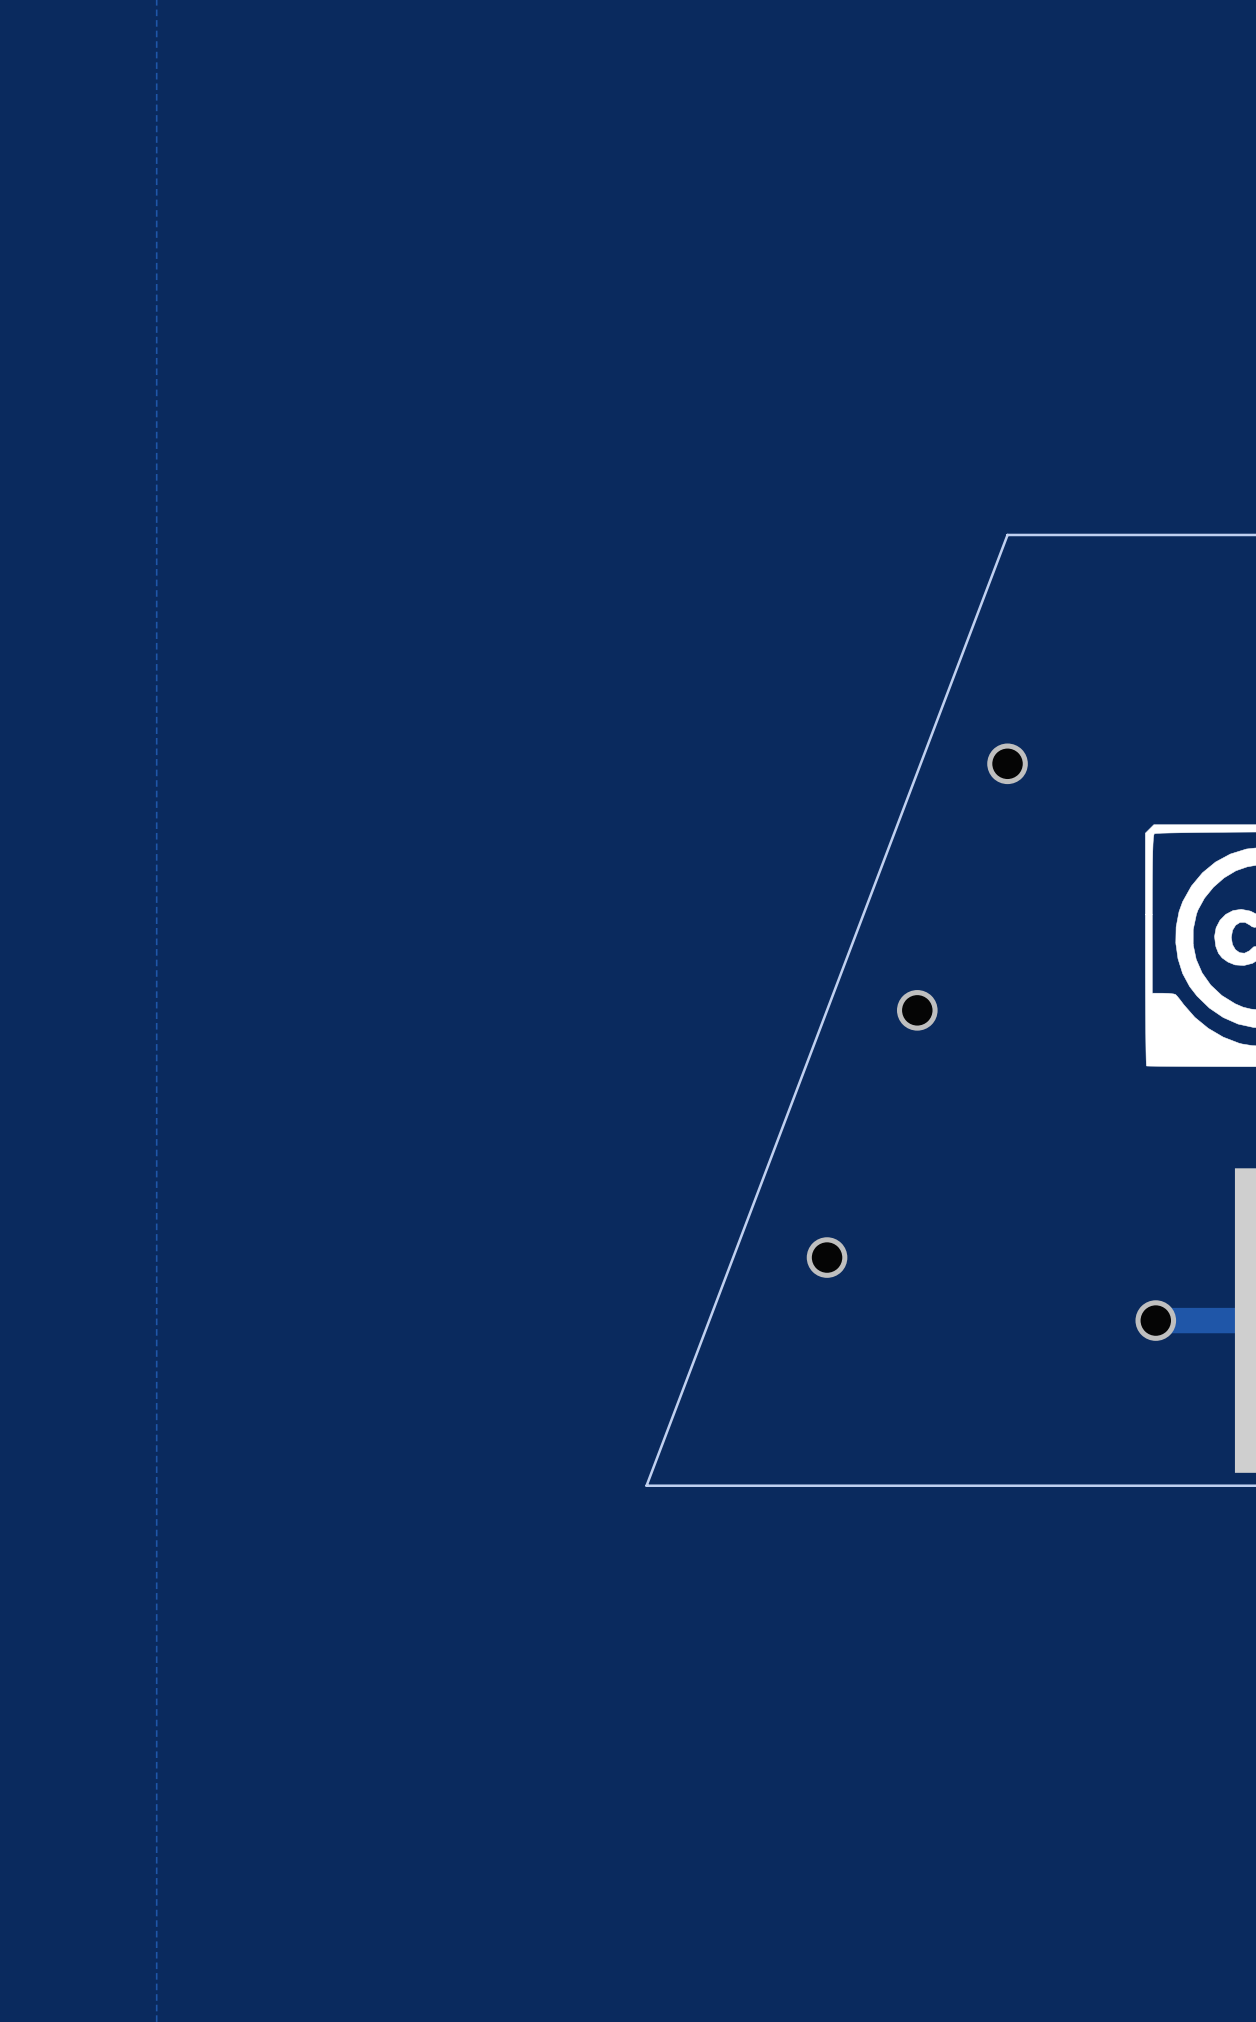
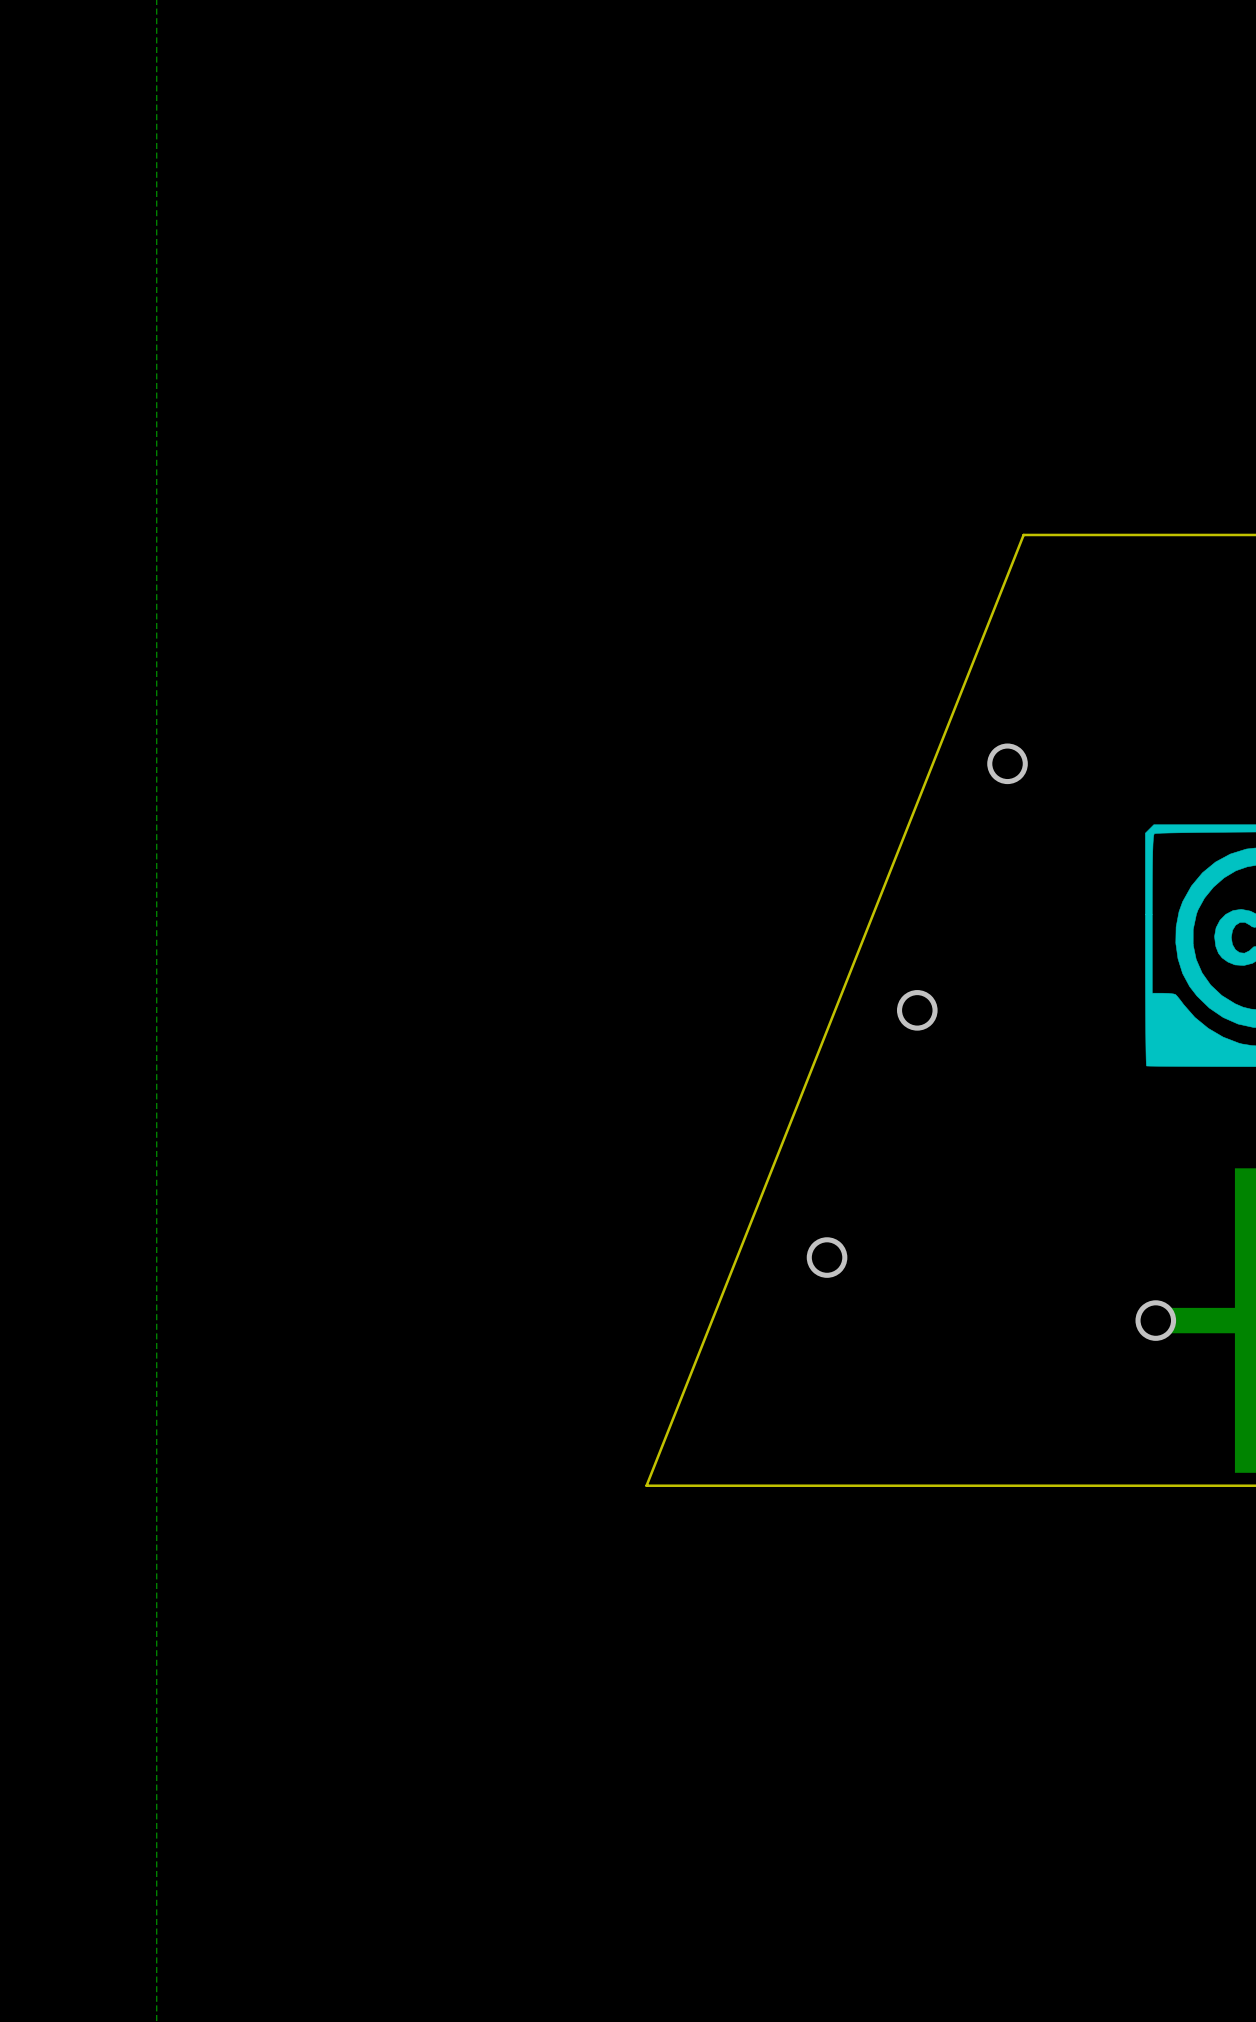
board edge: (1023, 534) (1007, 534) (646, 1485) -> (1023, 534) (646, 1485)

